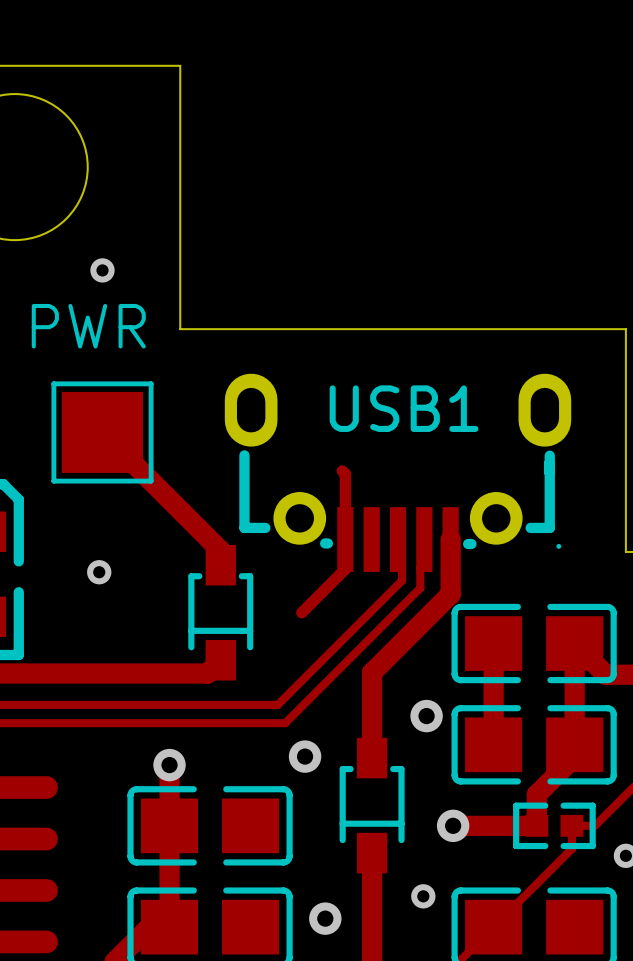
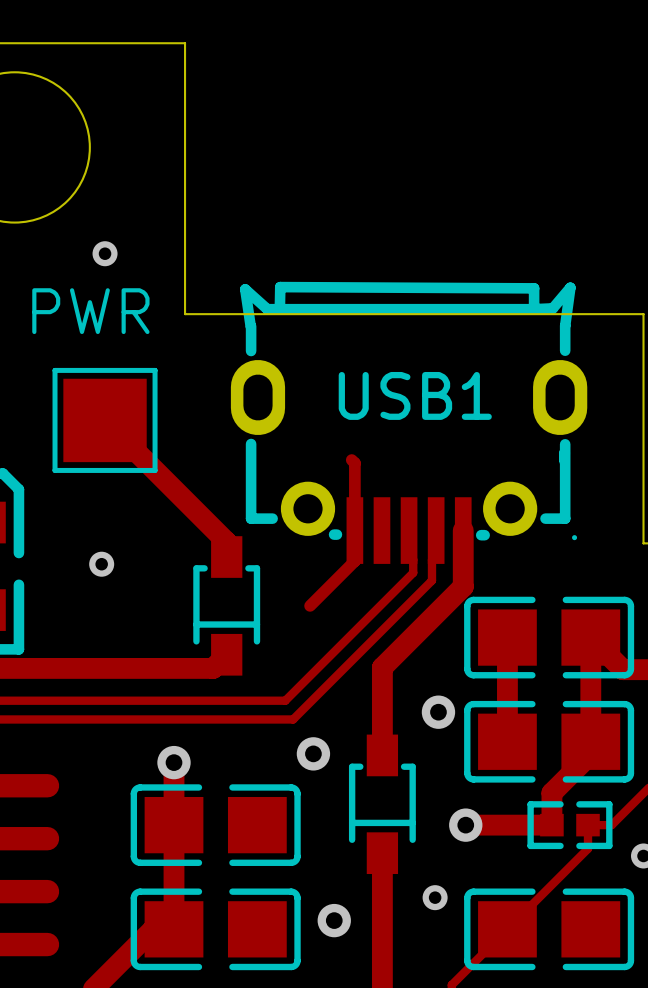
USB1 footprint: [224, 373, 572, 572] -> [230, 281, 588, 564]

